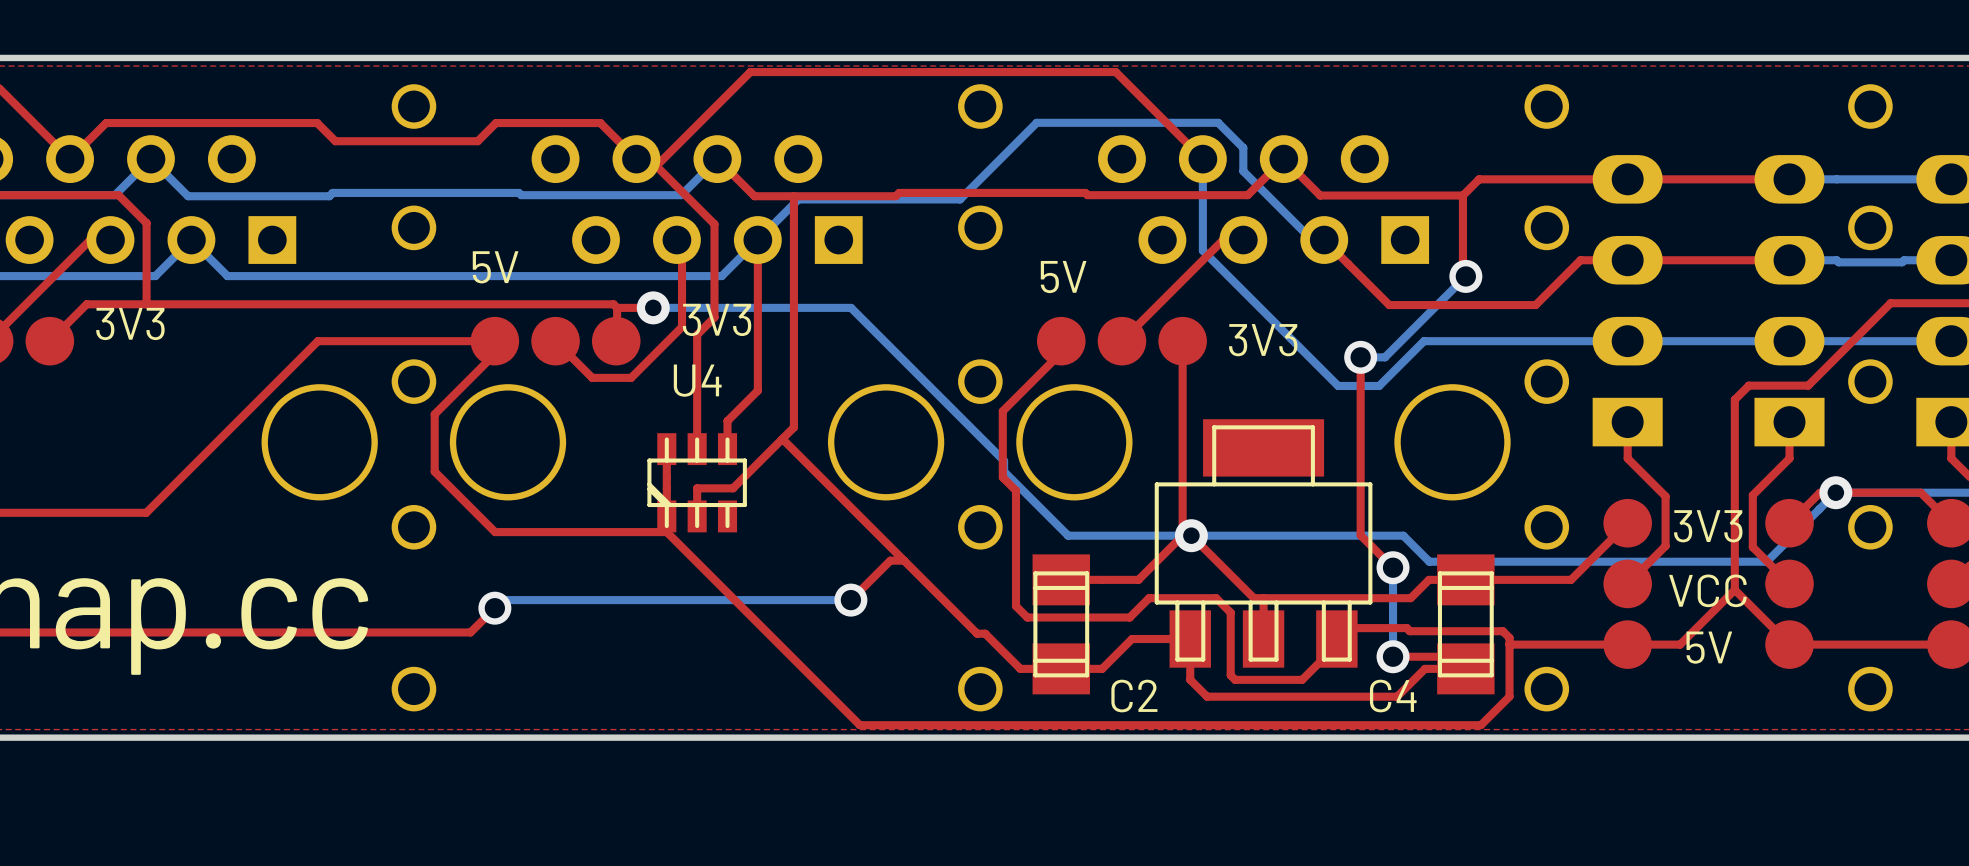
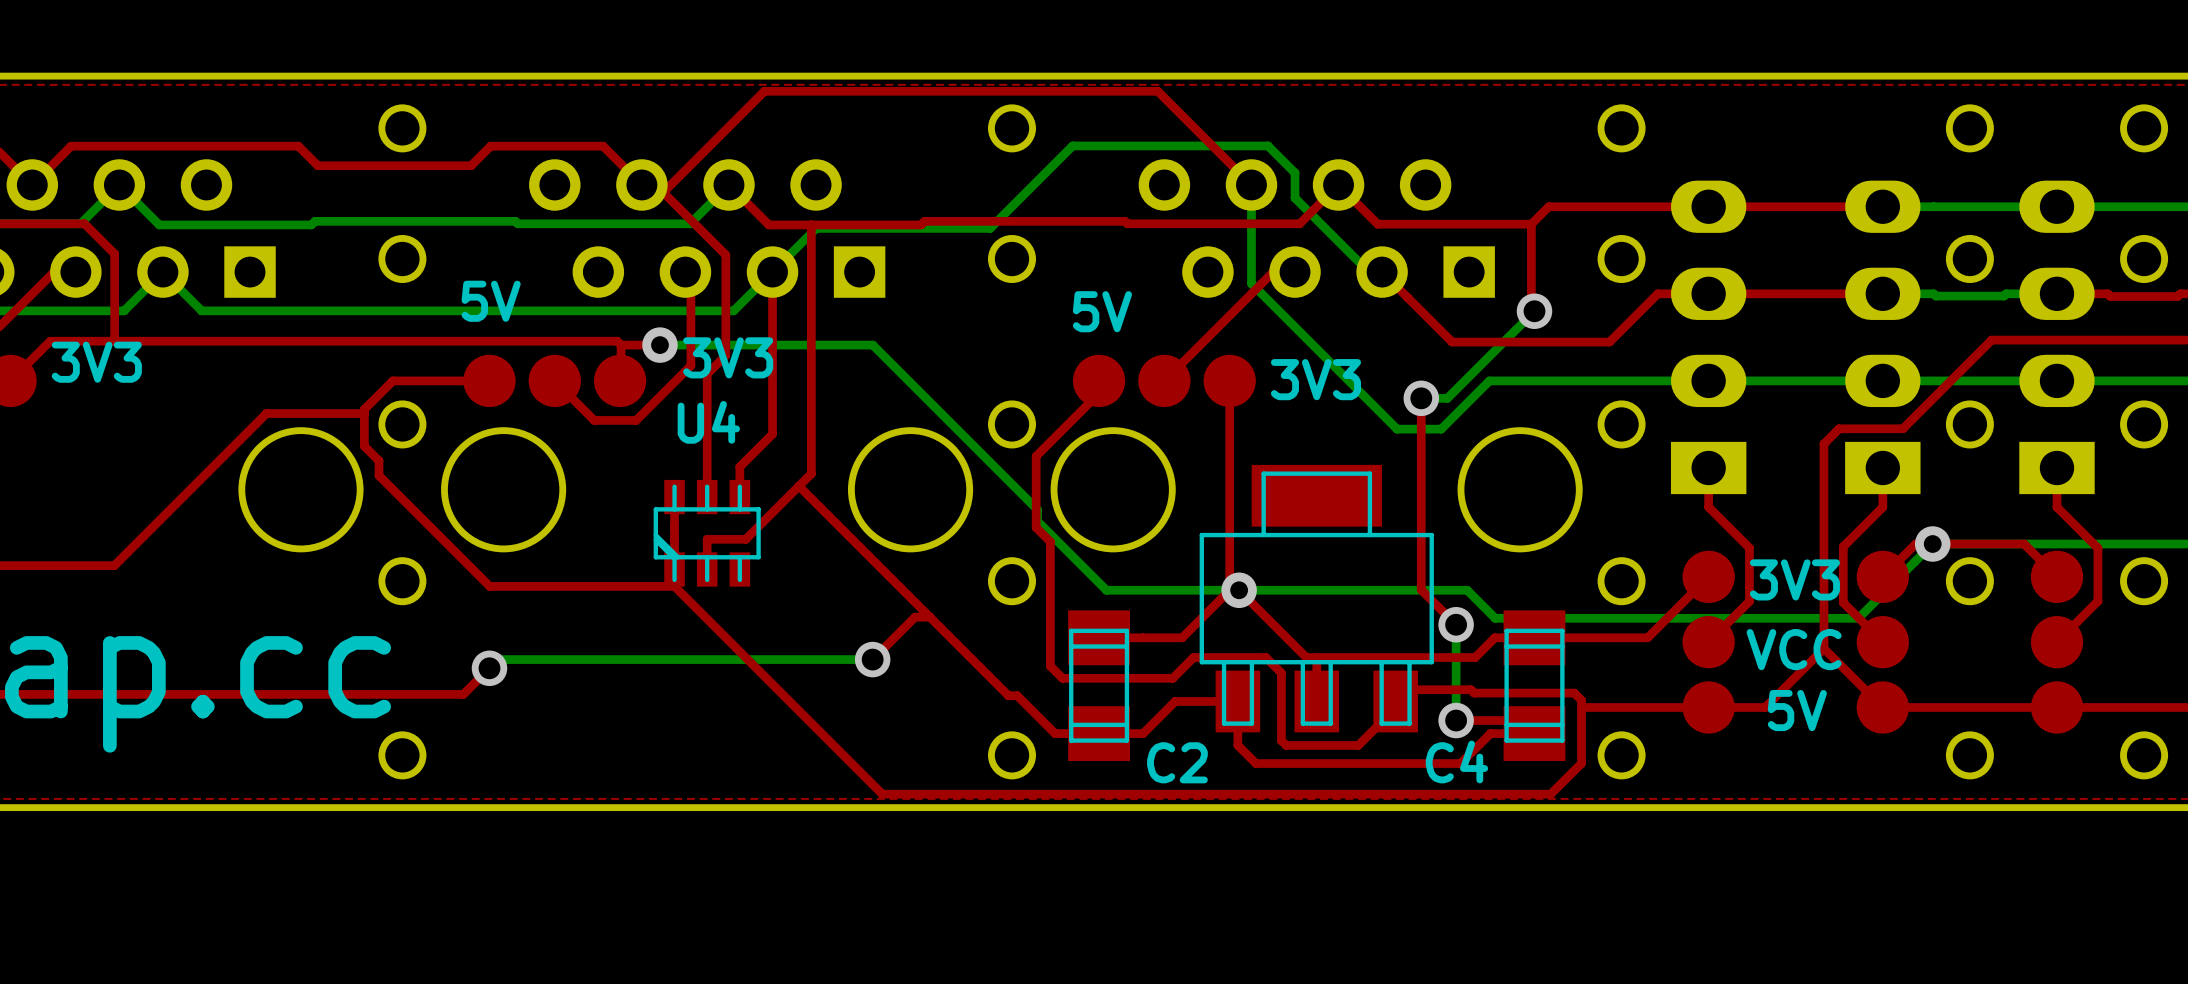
top track: (405, 341) (317, 341) (287, 371) -> (364, 413) (266, 413)
top track: (494, 341) (494, 354) (434, 414) (434, 471) -> (392, 380) (364, 409) (364, 446) (378, 460) (378, 475) (424, 521)

